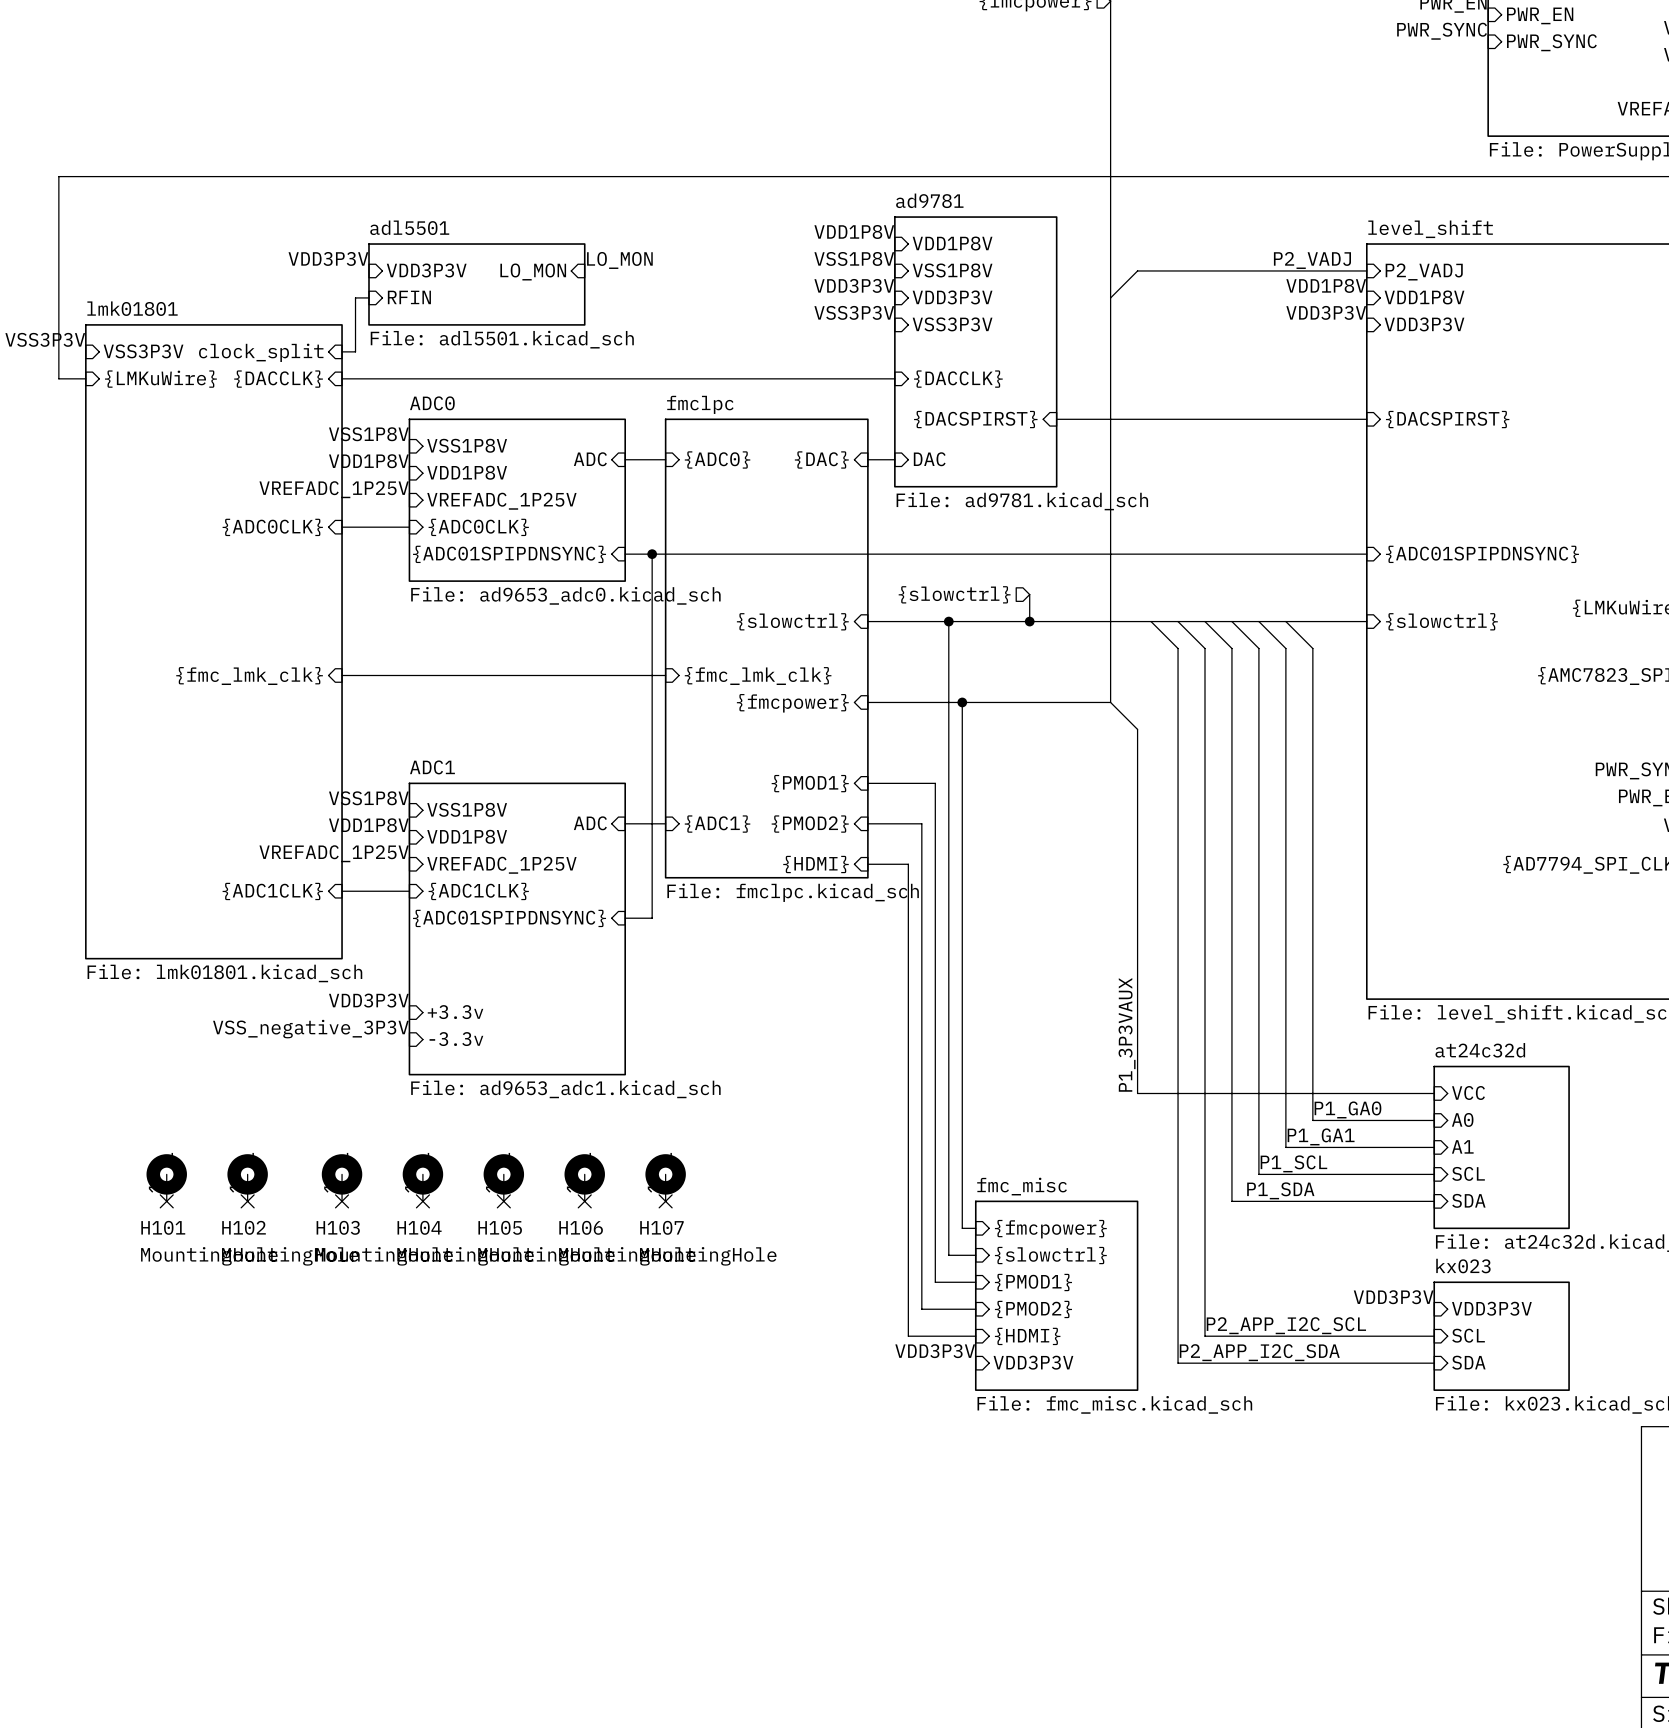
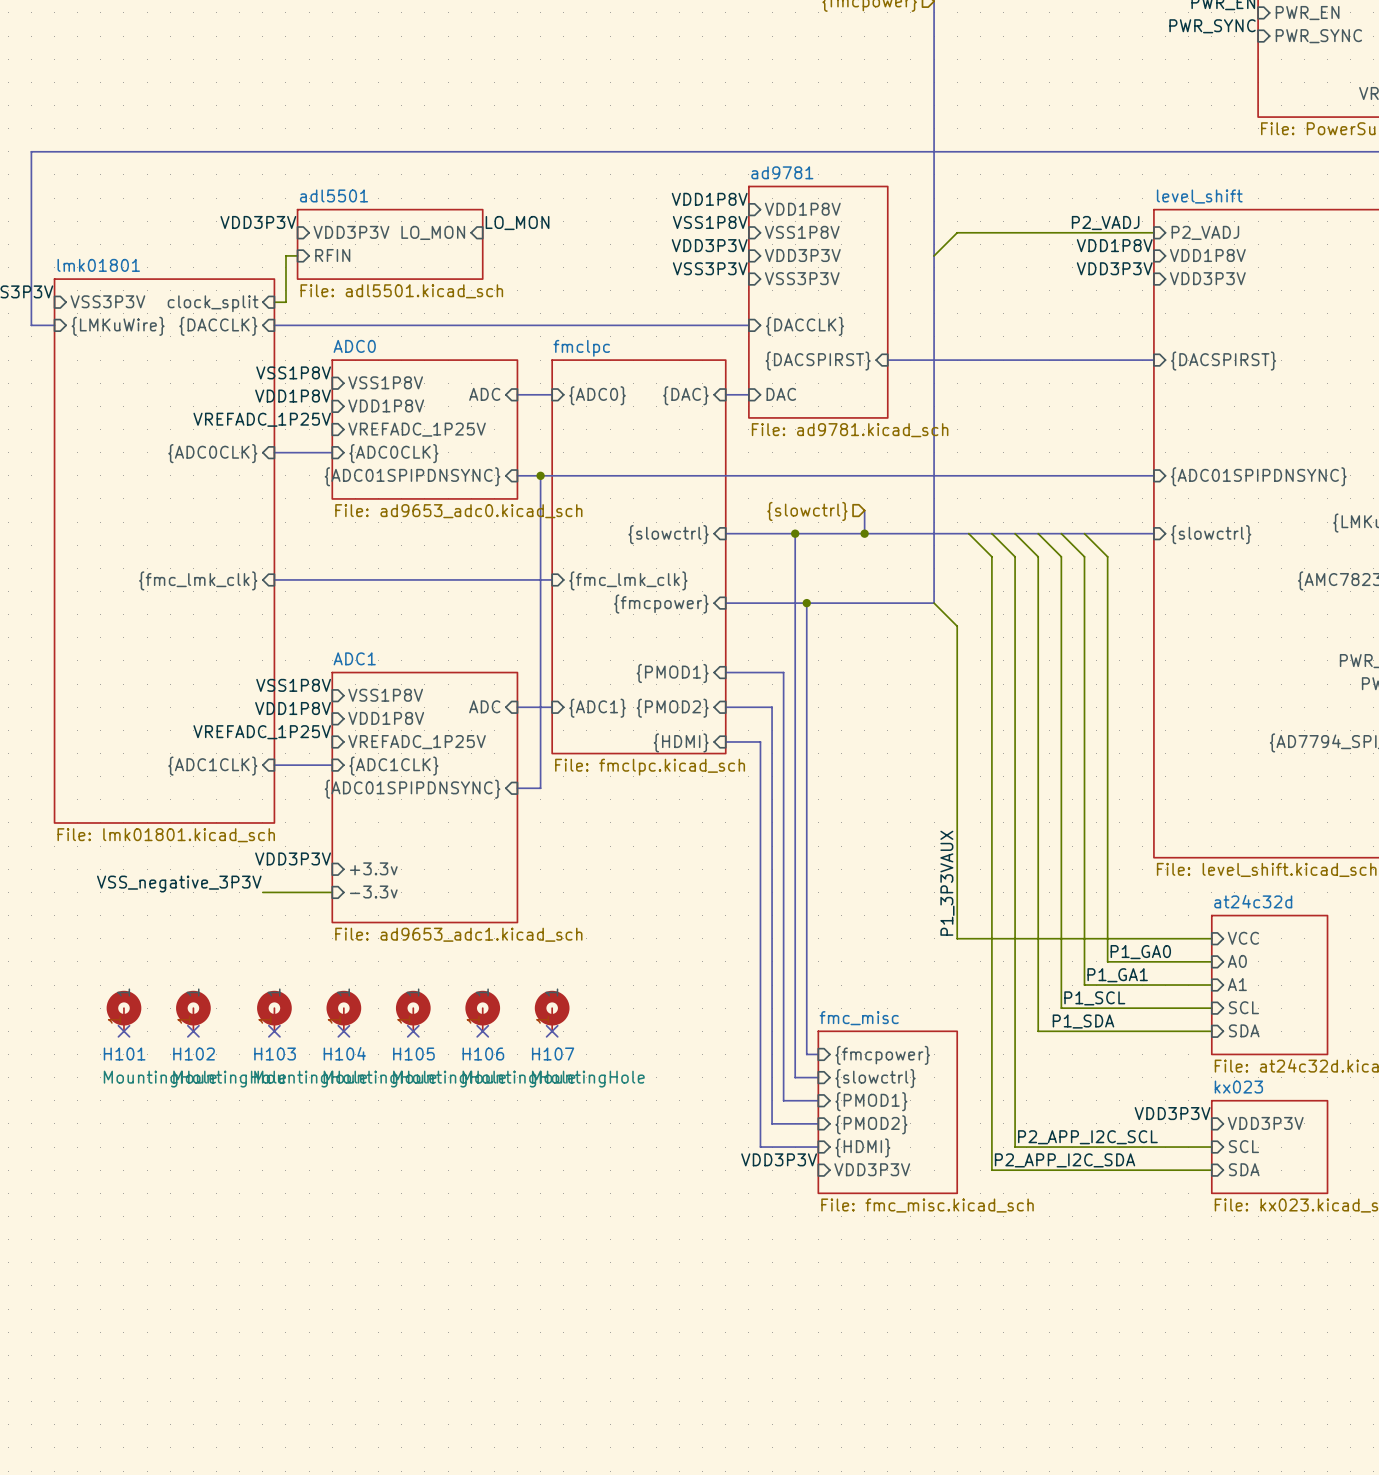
label position: VSS_negative_3P3V (310, 1029) -> VSS_negative_3P3V (179, 884)
wire: none -> (262, 892) (332, 892)

